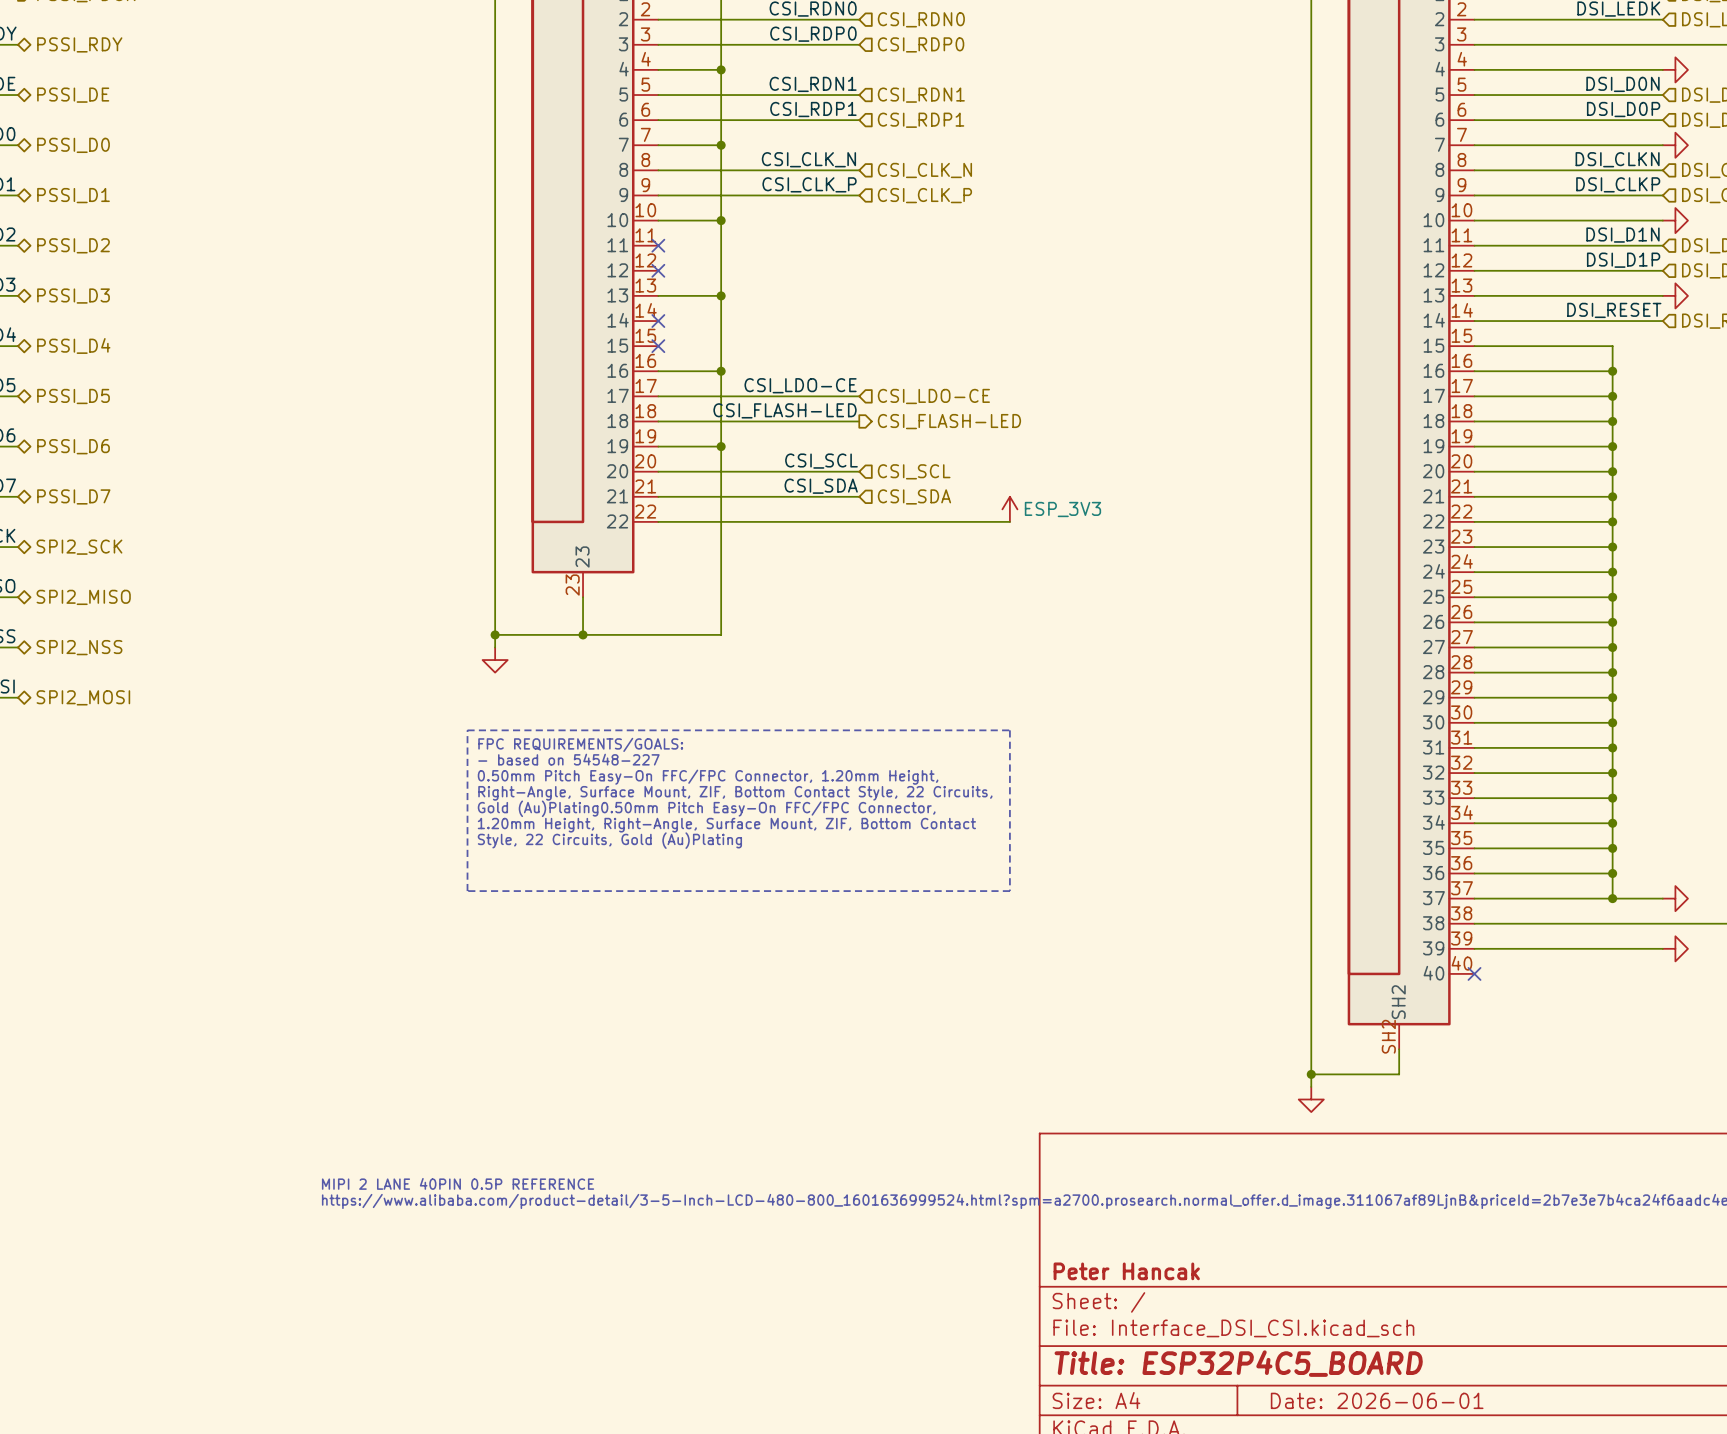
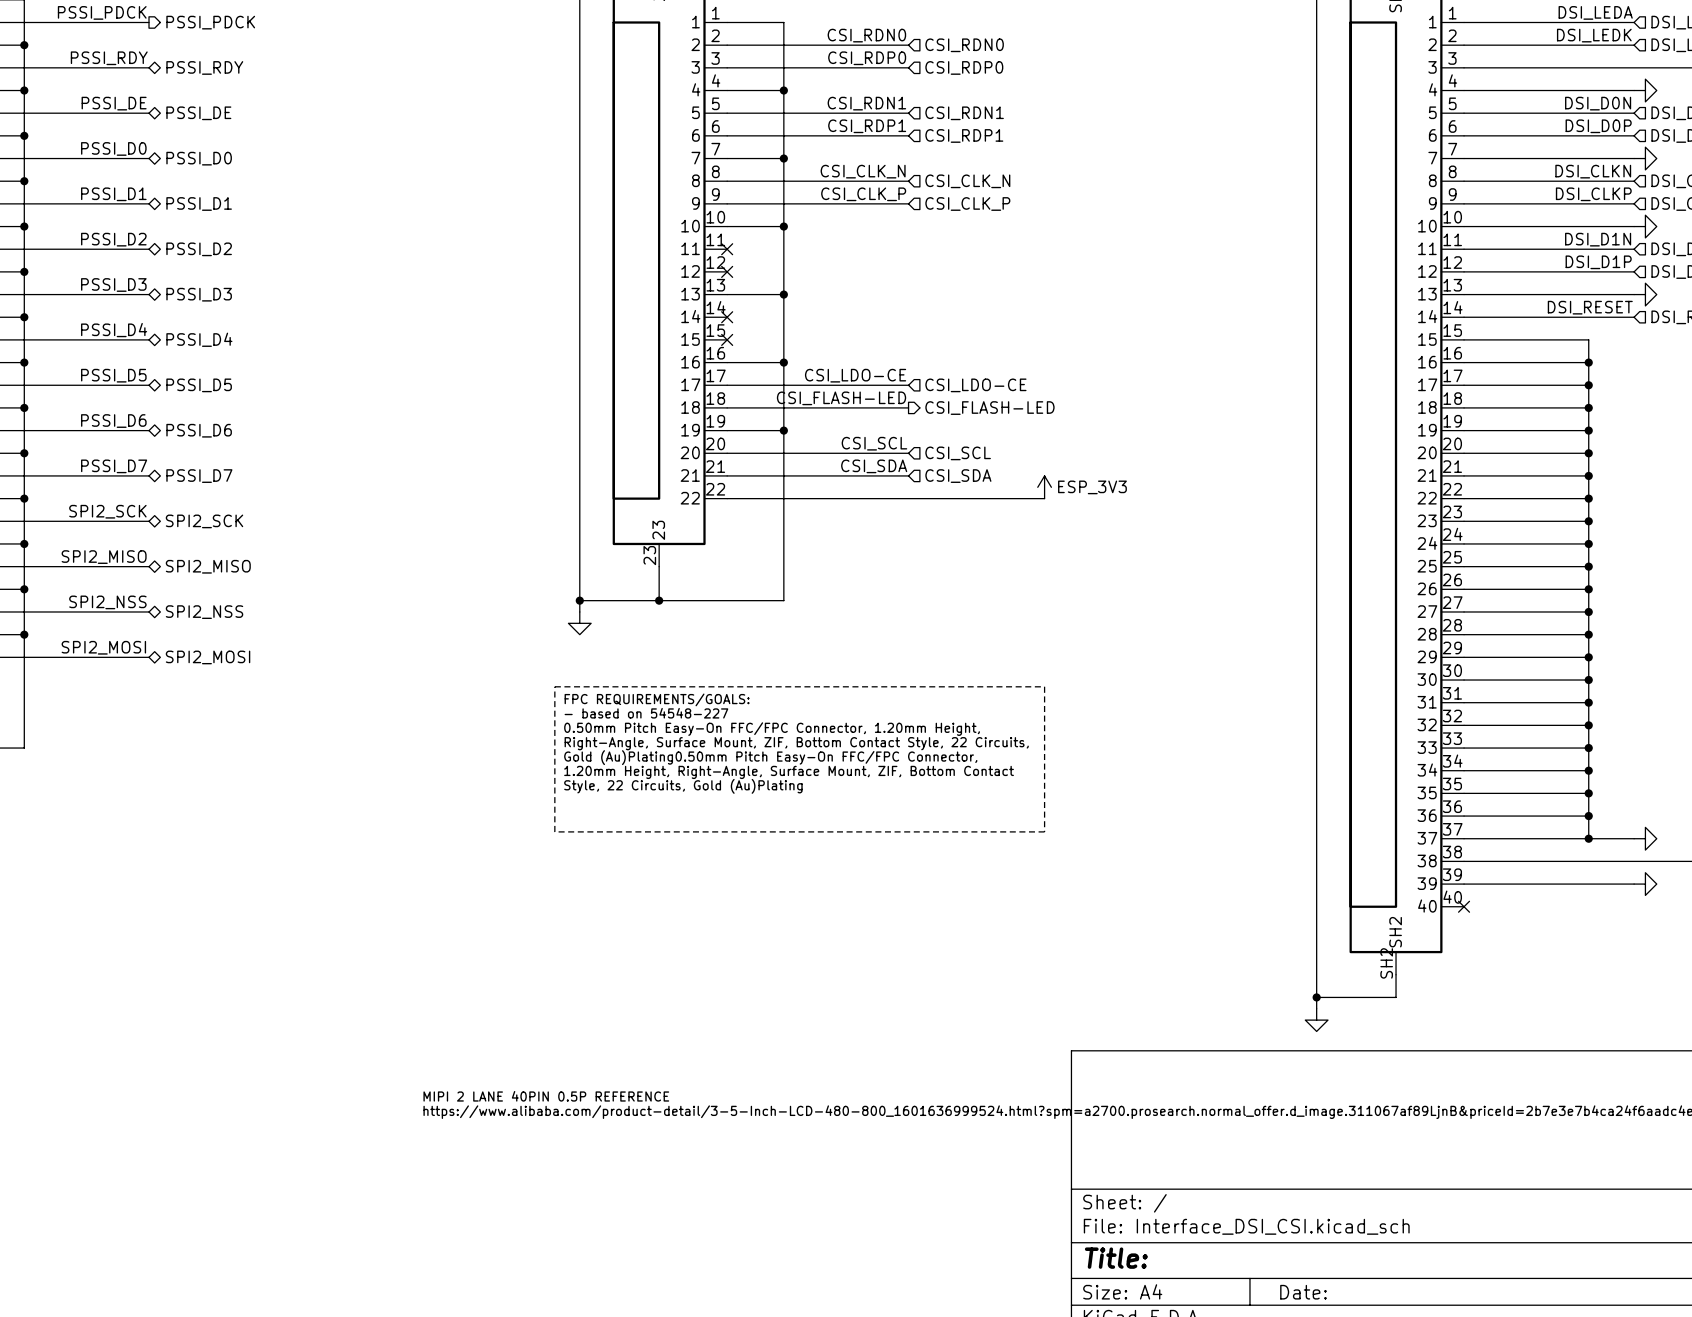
title block: Peter Hancak (1126, 1271) -> none
title block: Title: ESP32P4C5_BOARD (1238, 1363) -> Title: (1116, 1258)
title block: Date: 2026-06-01 (1377, 1400) -> Date: (1303, 1292)

